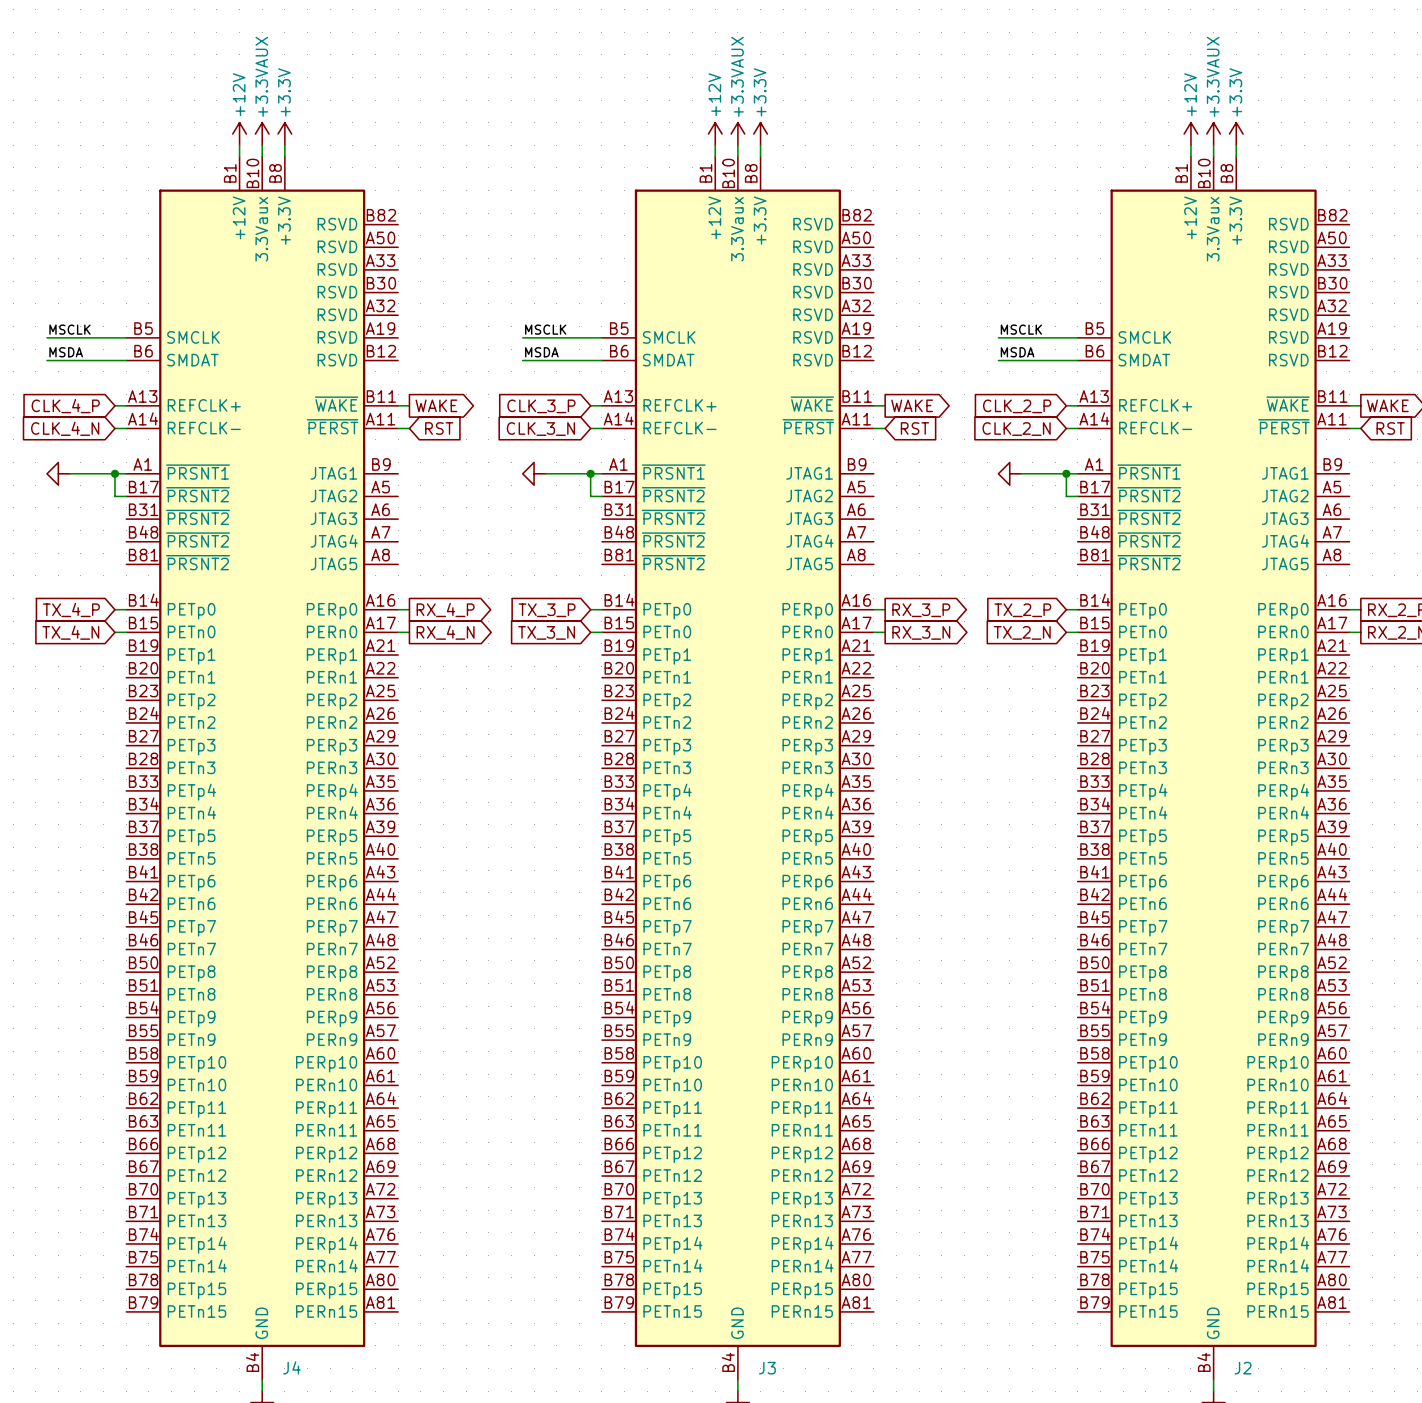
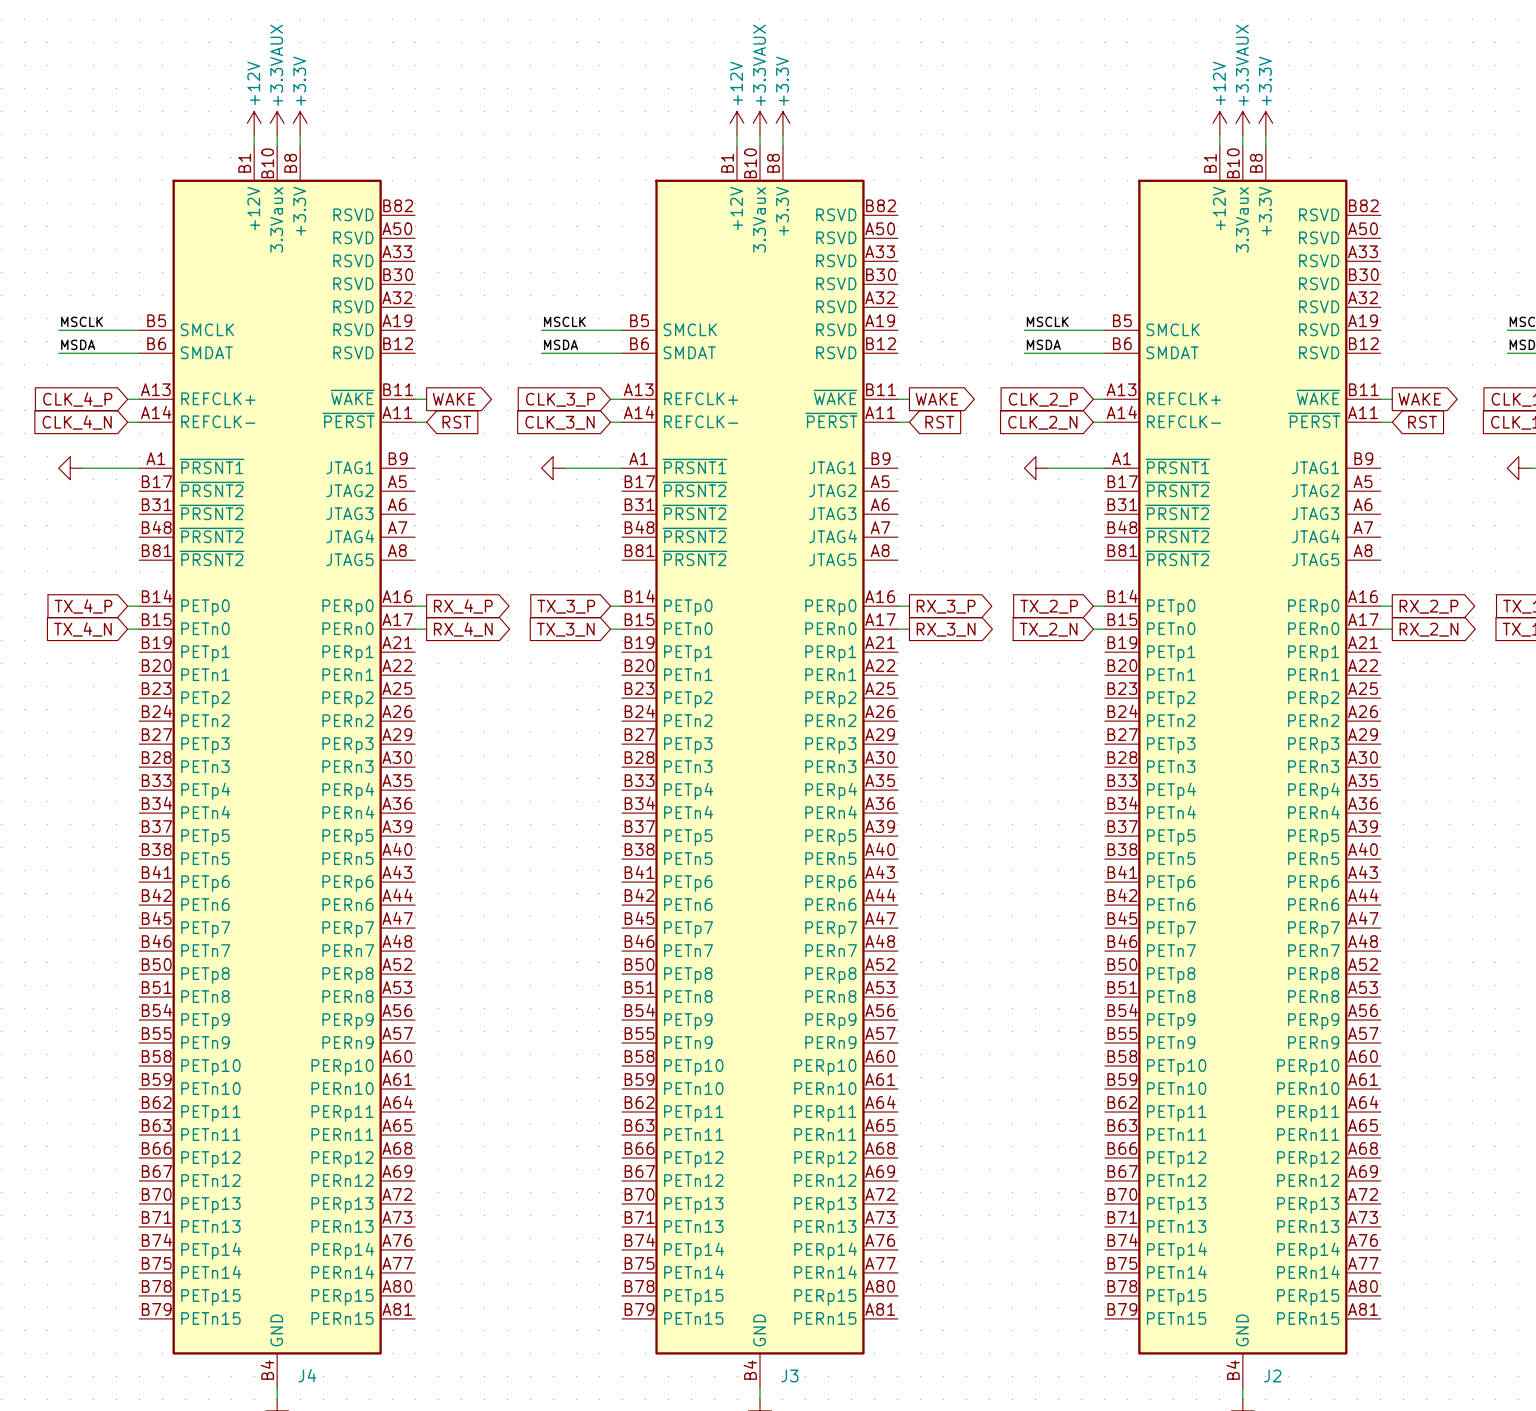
wire: (114, 473) (114, 496) (126, 496) -> none
junction: (114, 473) -> none
wire: (590, 473) (590, 496) (601, 496) -> none
junction: (590, 473) -> none
wire: (1066, 473) (1066, 496) (1077, 496) -> none
junction: (1066, 473) -> none

